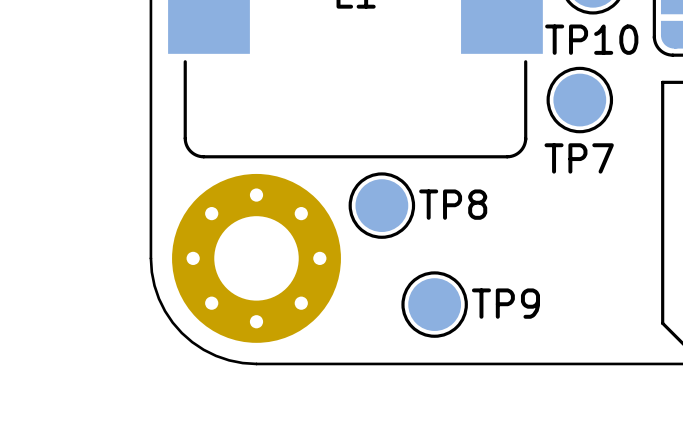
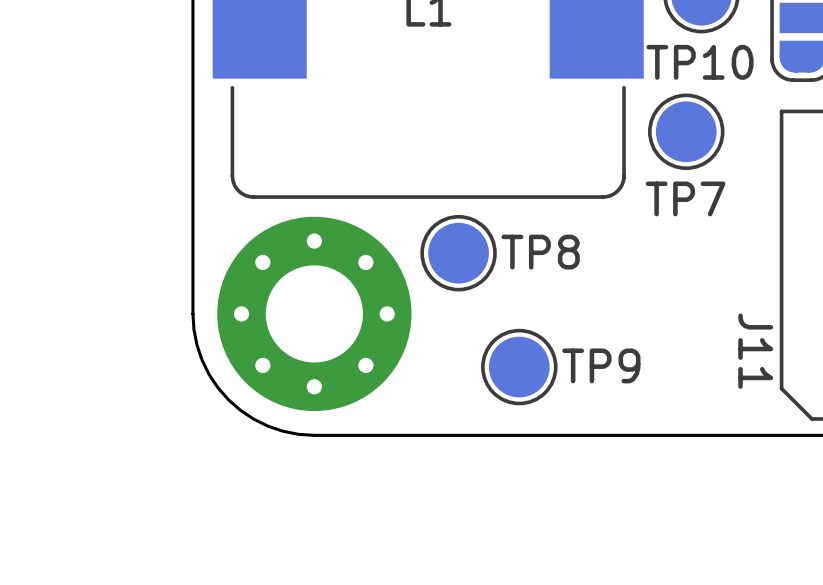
J11 name: none -> J11 (755, 351)

